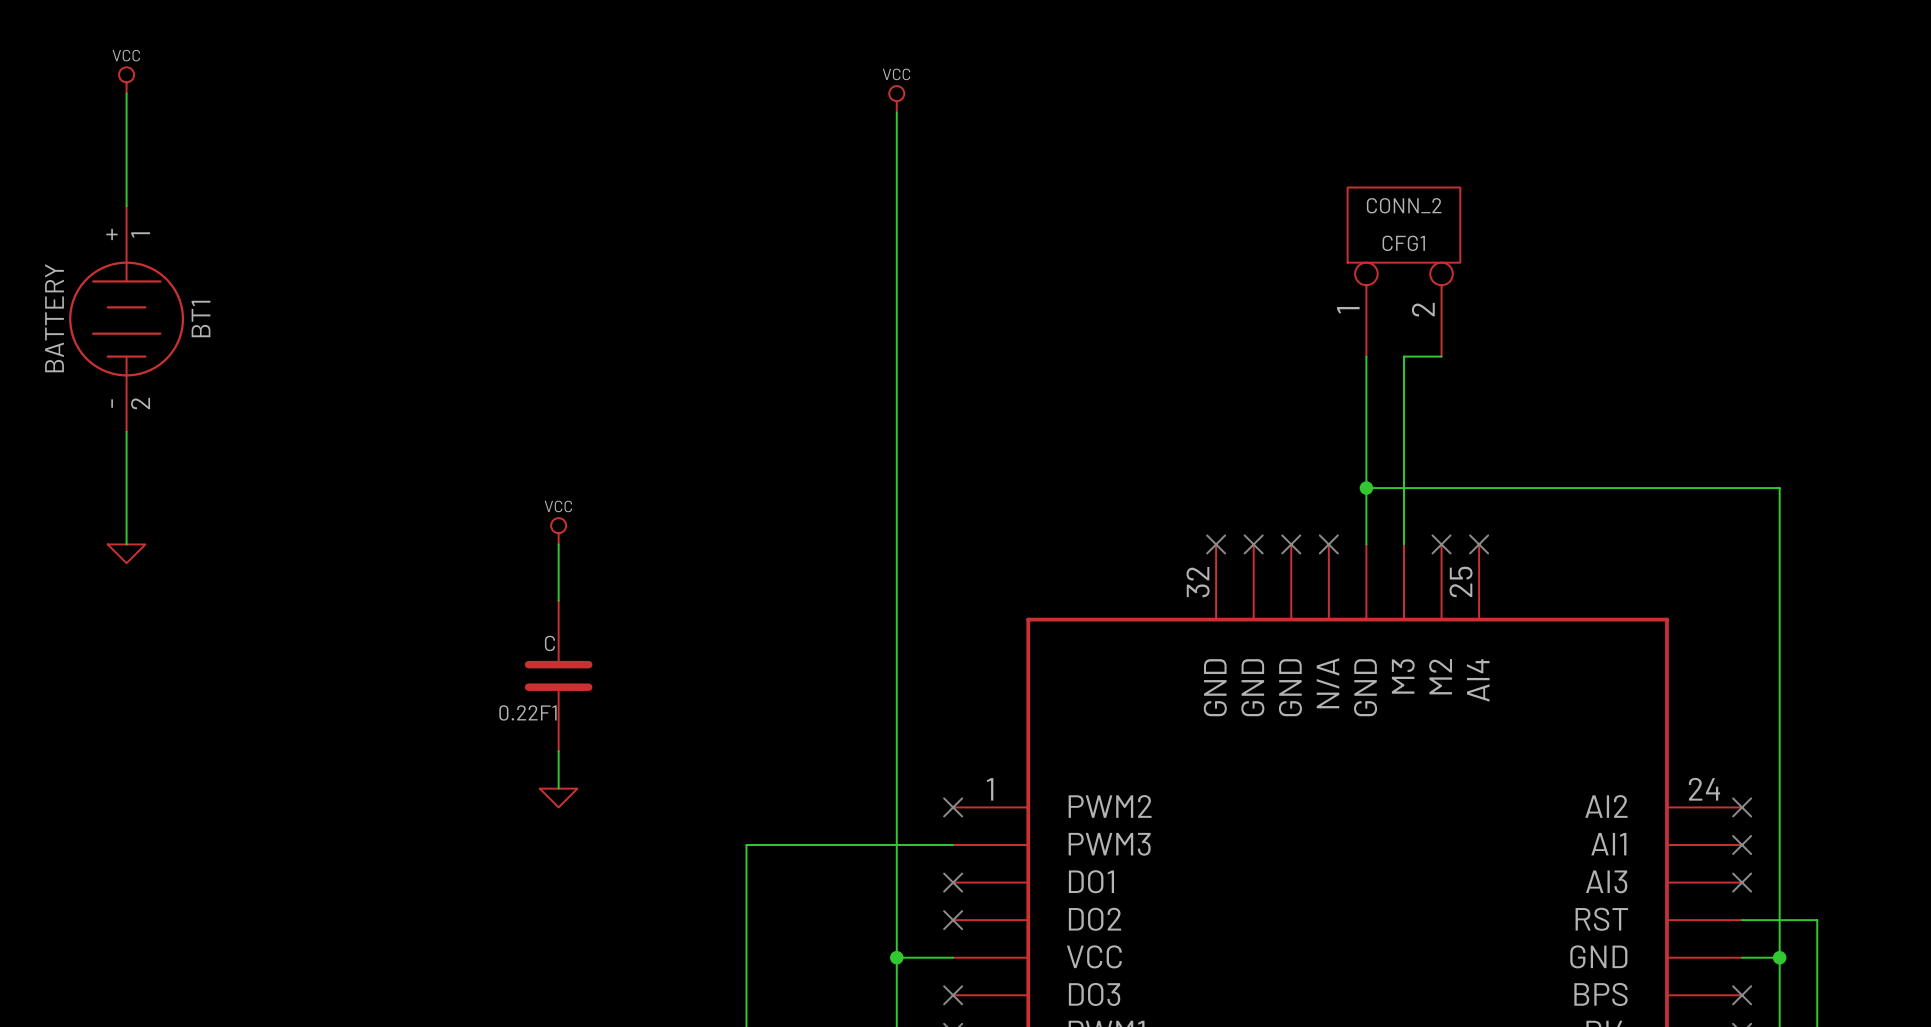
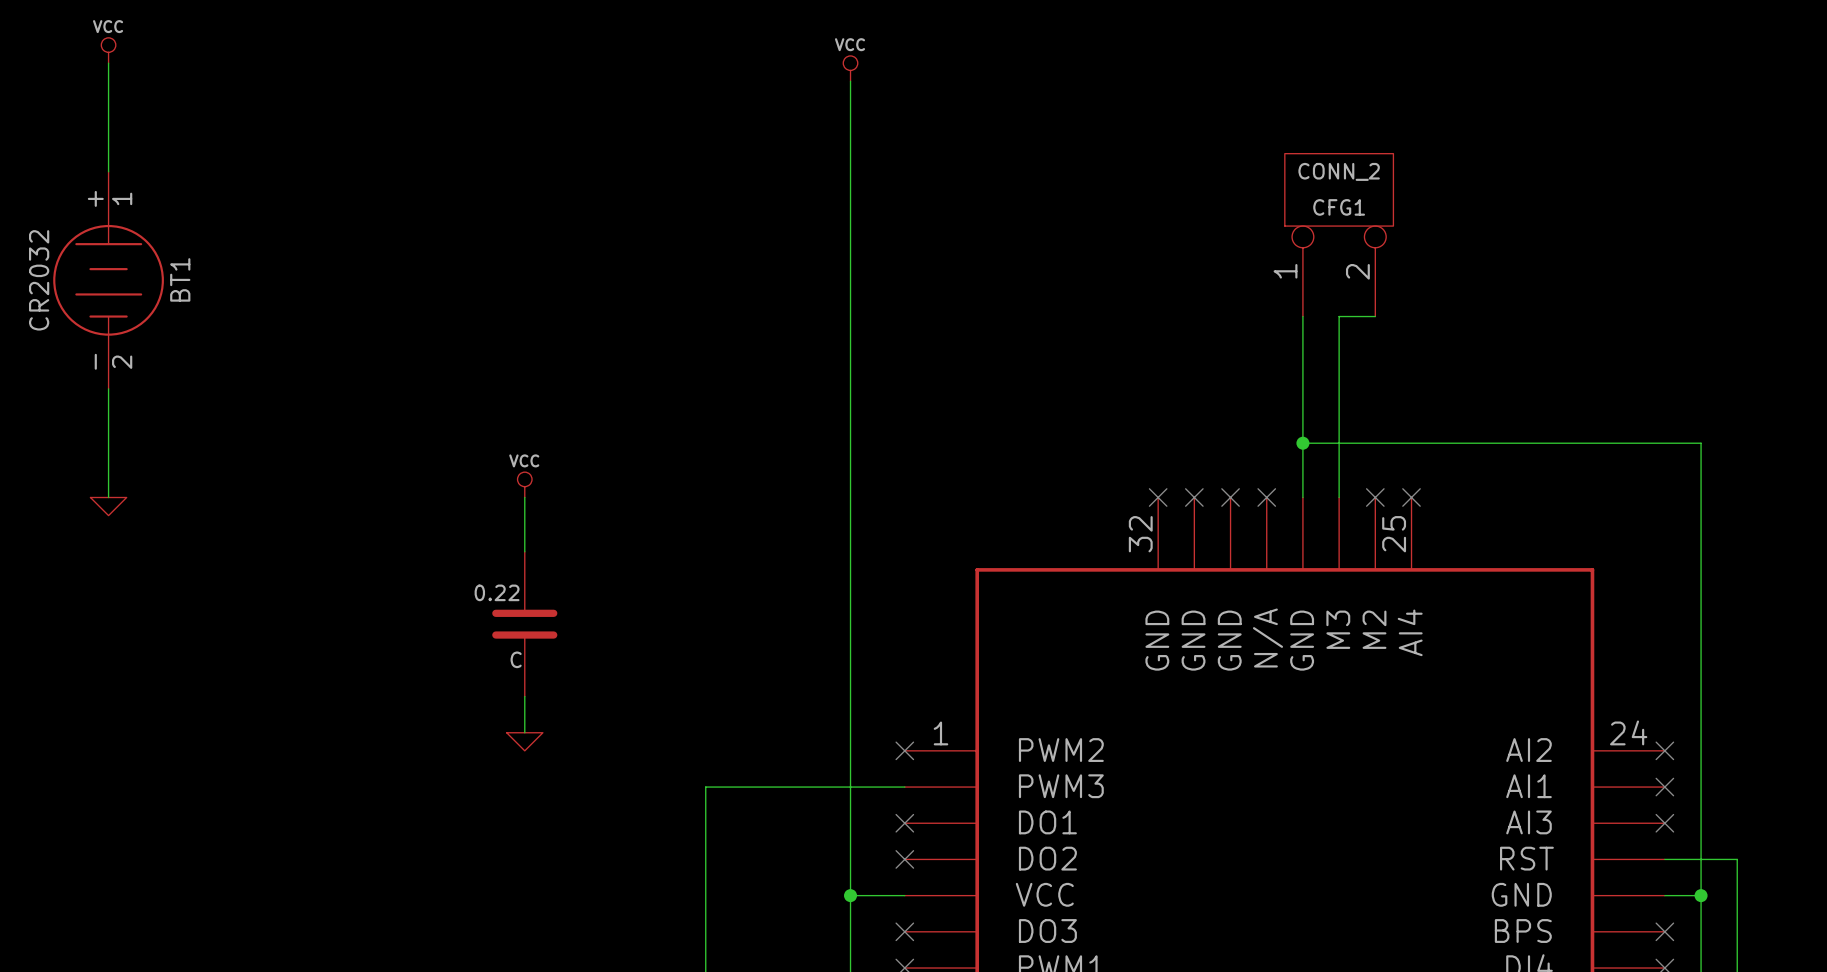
BT1 value: BATTERY (54, 318) -> CR2032 (39, 280)
0.22F1 value: C (549, 643) -> 0.22 (497, 592)
0.22F1 name: 0.22F1 (527, 712) -> C (516, 659)

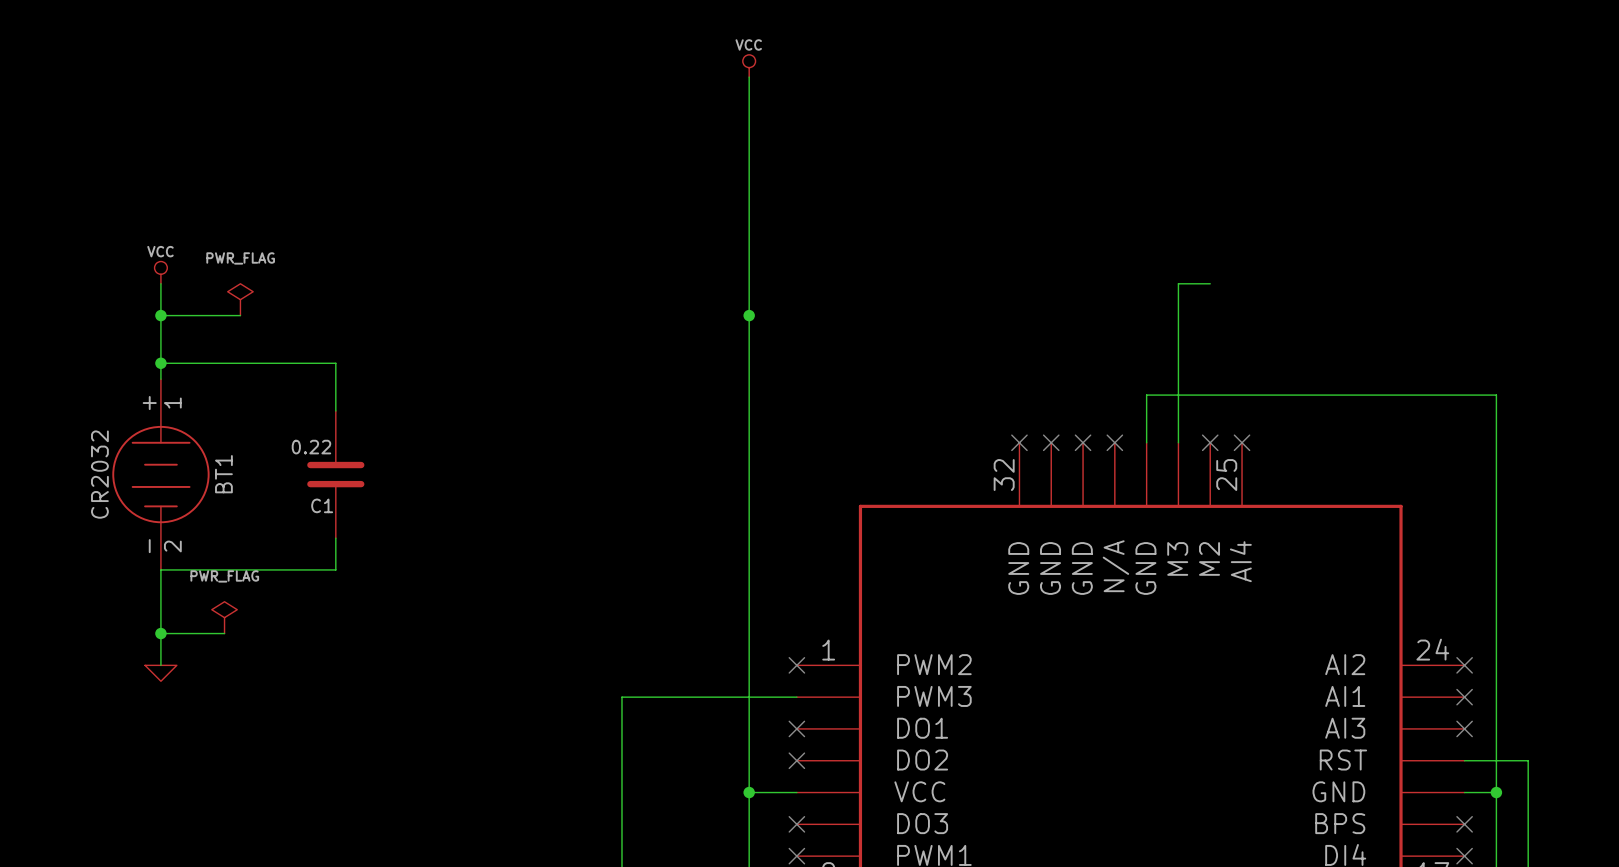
power symbol: VCC (108, 50) -> none
wire: (108, 63) (108, 171) -> none
CFG1: CONN_2 (1339, 235) -> none
BT1 position: (108, 280) -> (160, 474)
power symbol: none -> VCC (160, 272)
wire: (1302, 316) (1302, 443) -> none
power symbol: none -> PWR_FLAG (240, 299)
wire: none -> (160, 315) (240, 315)
junction: none -> (160, 315)
junction: none -> (749, 315)
wire: (108, 388) (108, 497) -> (160, 283) (160, 379)
wire: none -> (160, 363) (335, 363) (335, 410)
junction: none -> (160, 363)
junction: (1302, 443) -> none
power symbol: VCC (524, 484) -> none
wire: (524, 497) (524, 551) -> none
power symbol: (108, 506) -> none
C1: none -> 0.22 (335, 474)
wire: none -> (335, 538) (335, 569) (160, 569) (160, 665)
C: 0.22 (524, 624) -> none
power symbol: none -> PWR_FLAG (224, 617)
wire: (524, 696) (524, 732) -> none
wire: none -> (160, 633) (224, 633)
junction: none -> (160, 633)
power symbol: (524, 741) -> none
power symbol: none -> (160, 673)

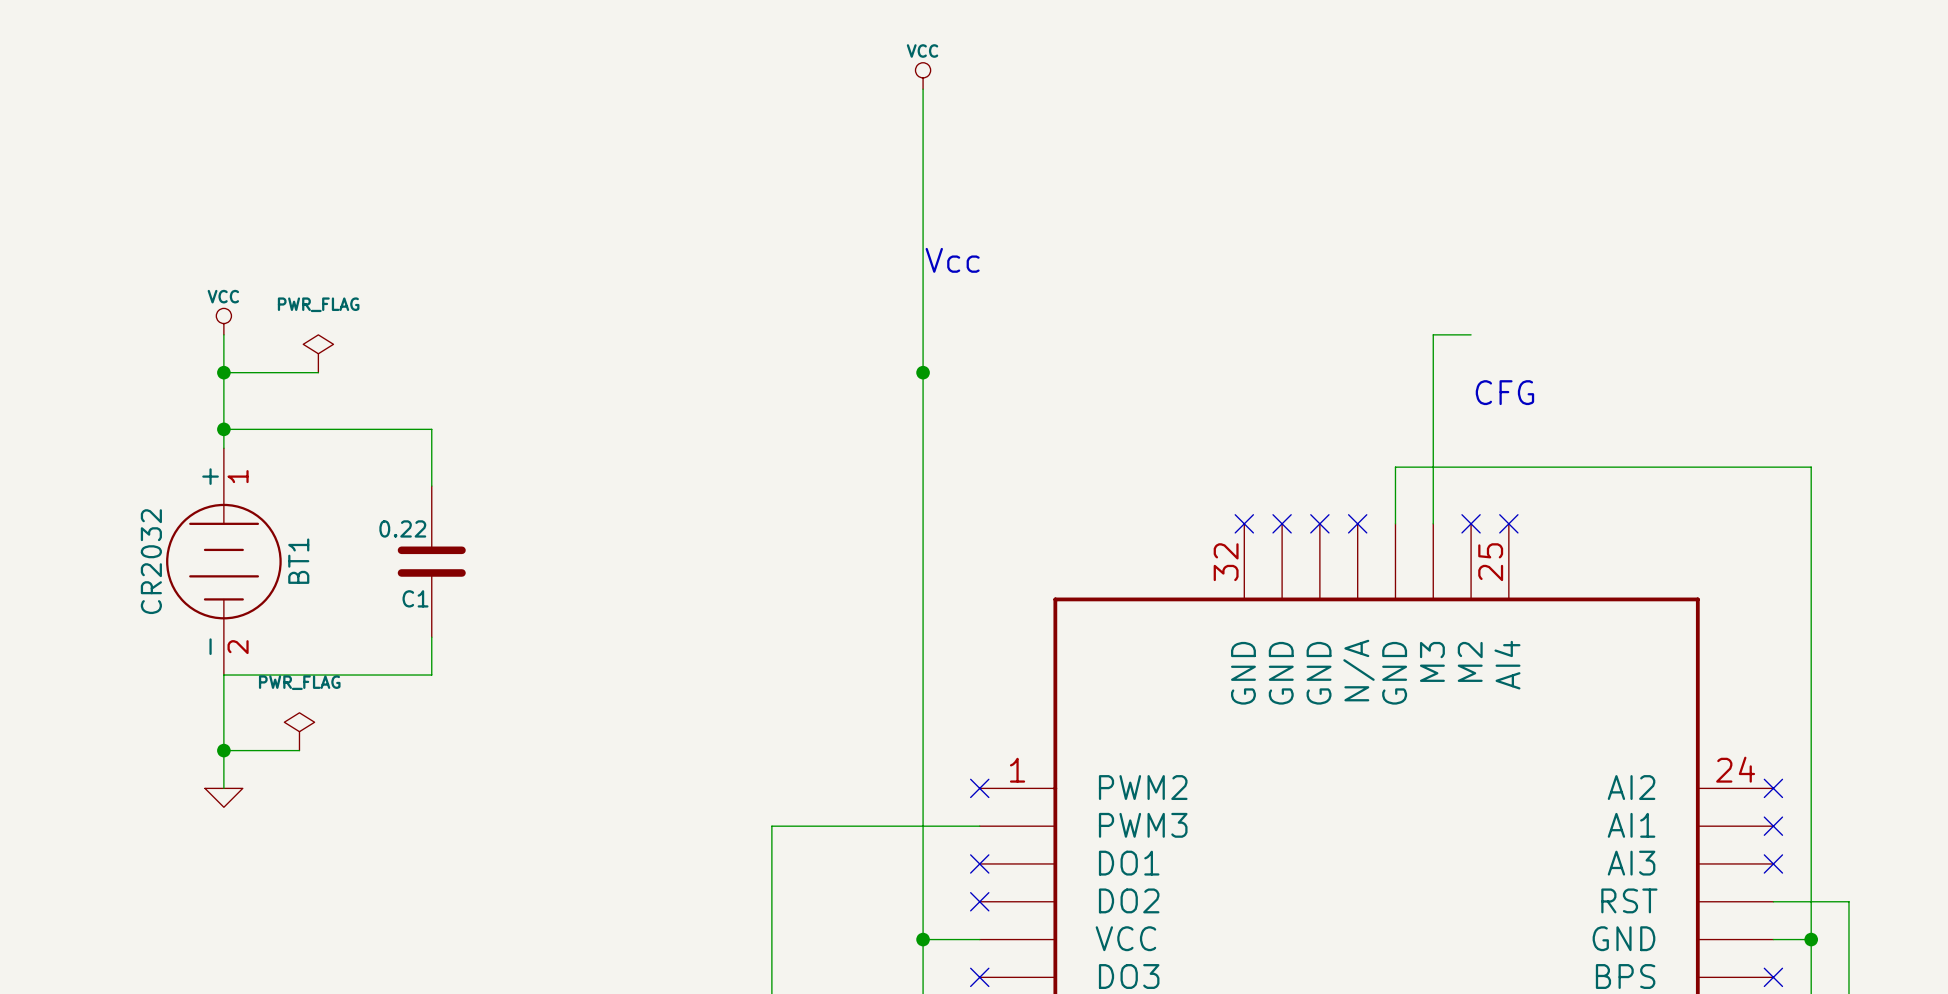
text: none -> Vcc (952, 260)
text: none -> CFG (1504, 392)

